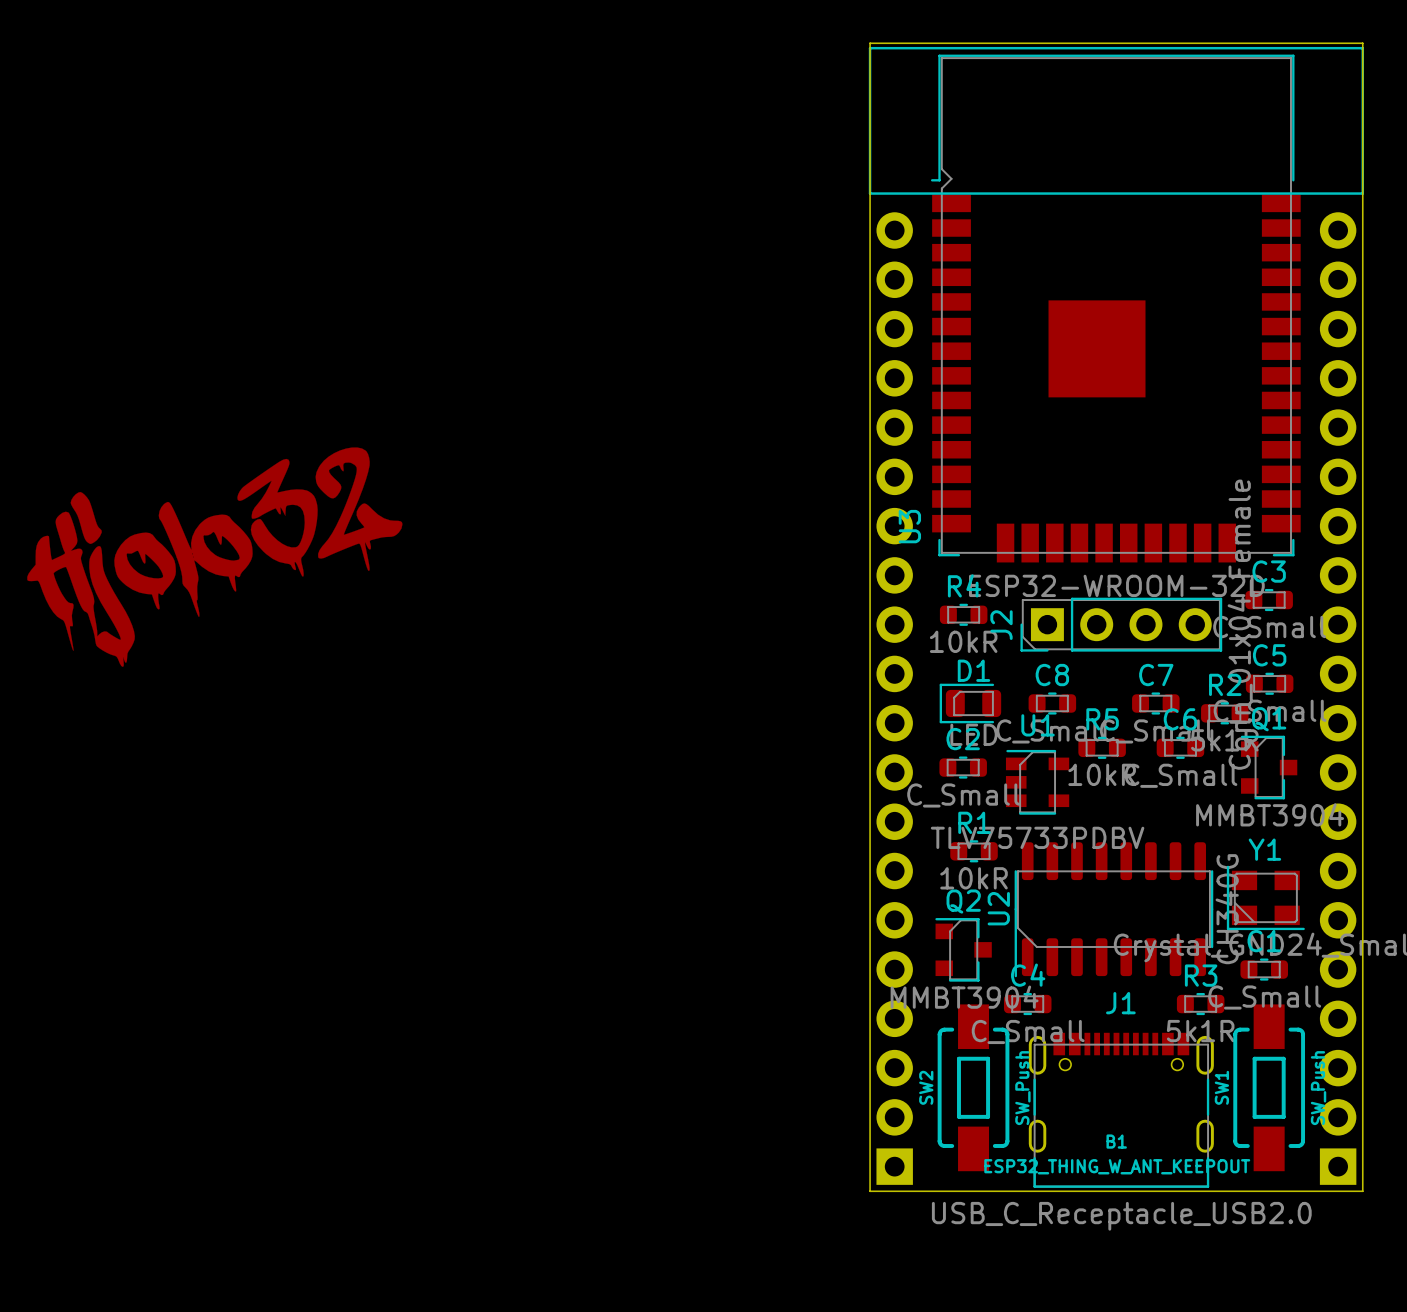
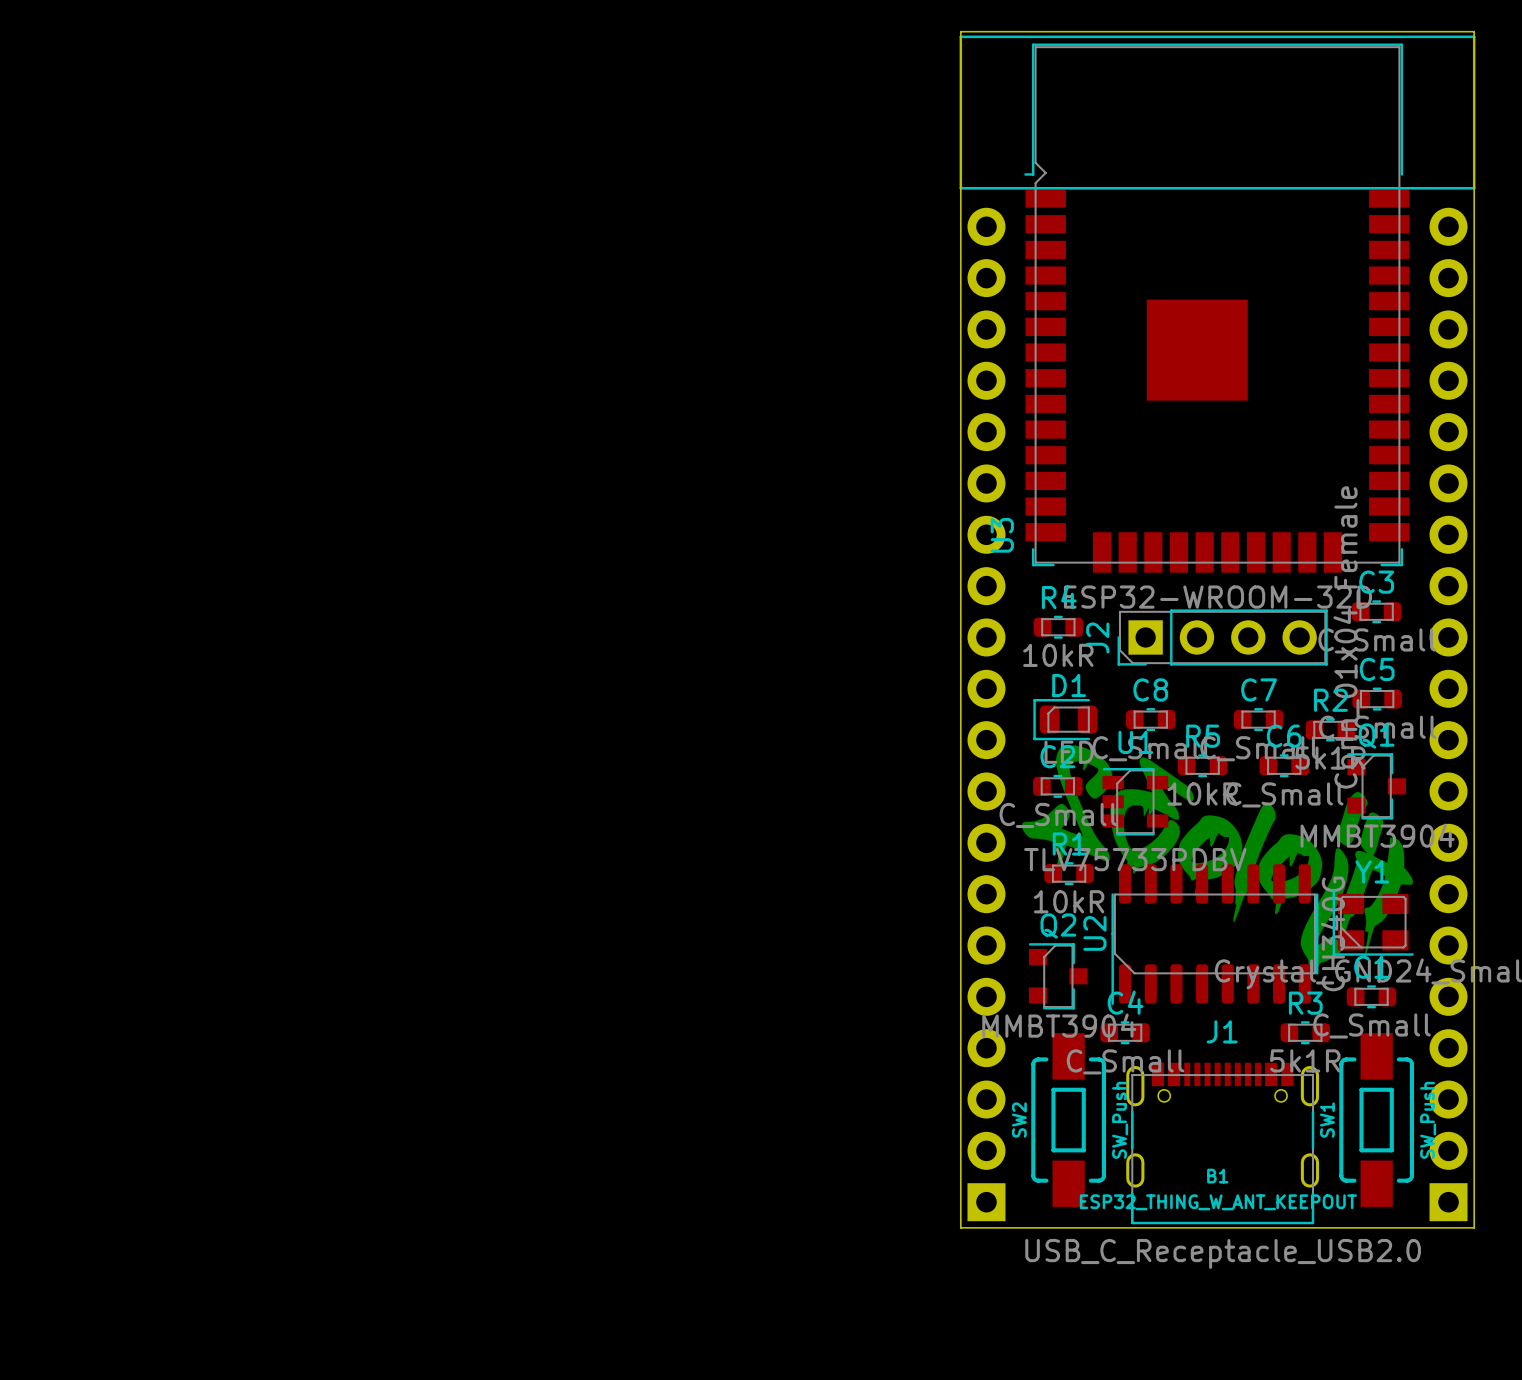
drawing: [27, 447, 403, 667] -> none
drawing: none -> [1021, 745, 1413, 975]

